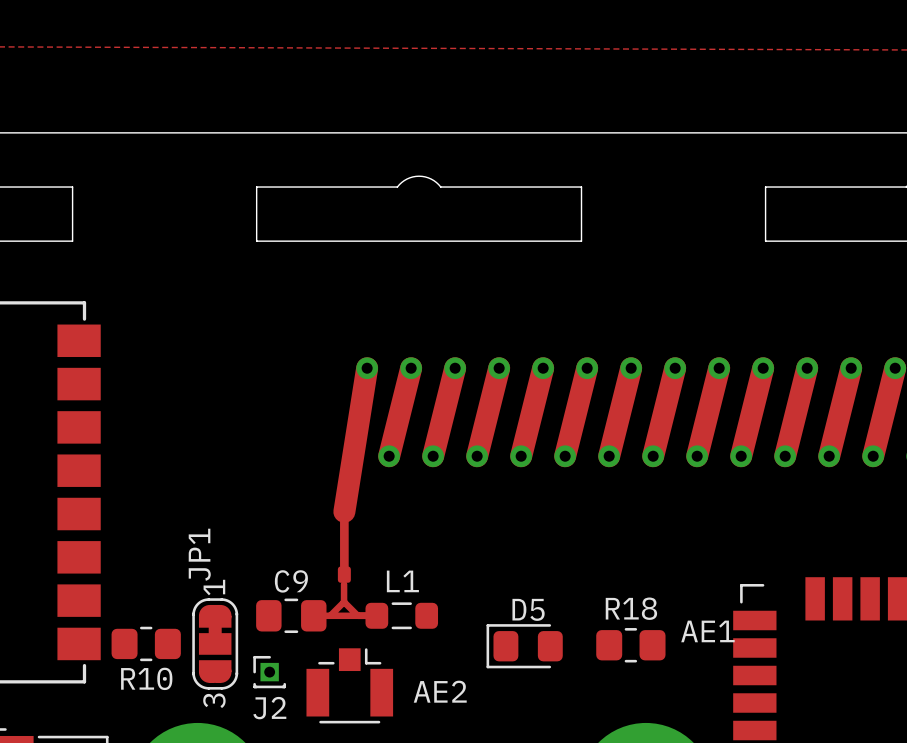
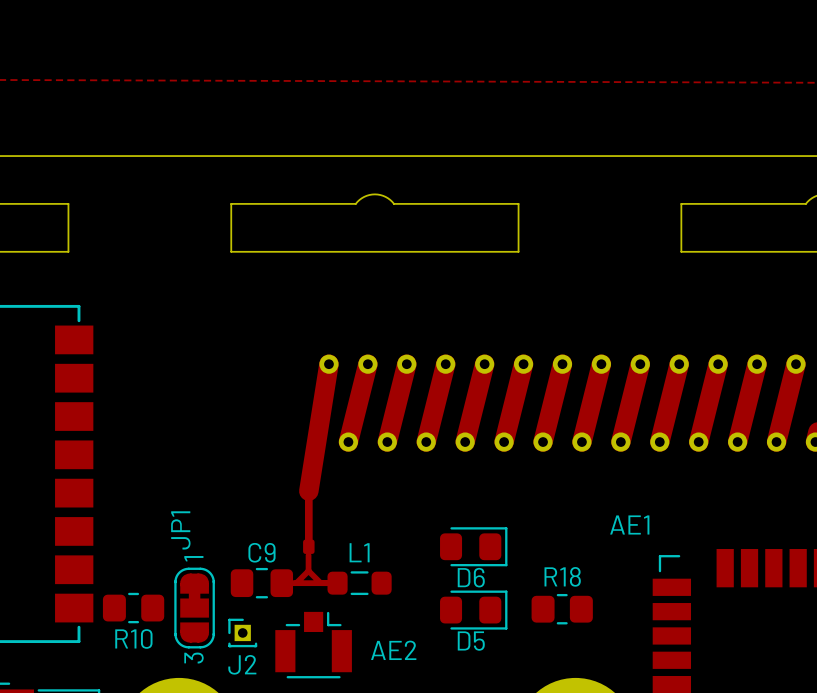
D6: none -> (473, 546)
AE1 name position: AE1 (707, 631) -> AE1 (629, 524)
D5 rotation: 0° (524, 646) -> 180° (473, 610)

